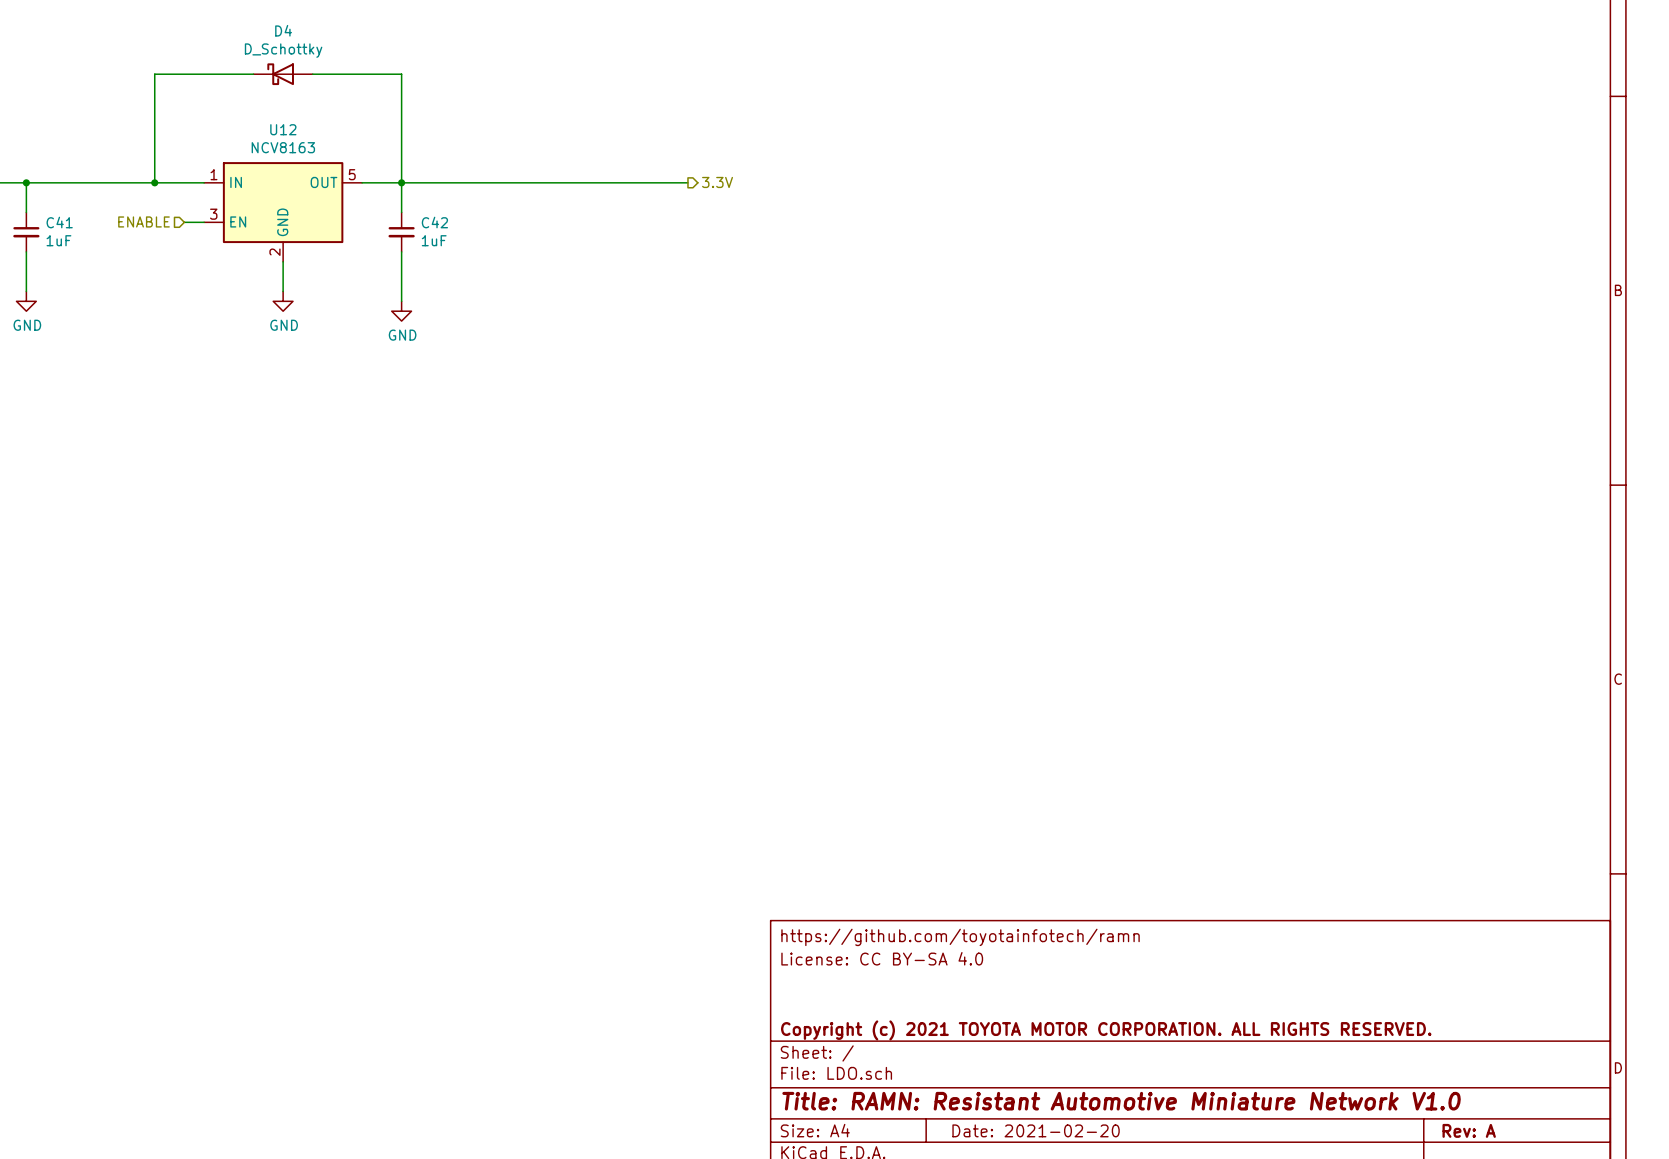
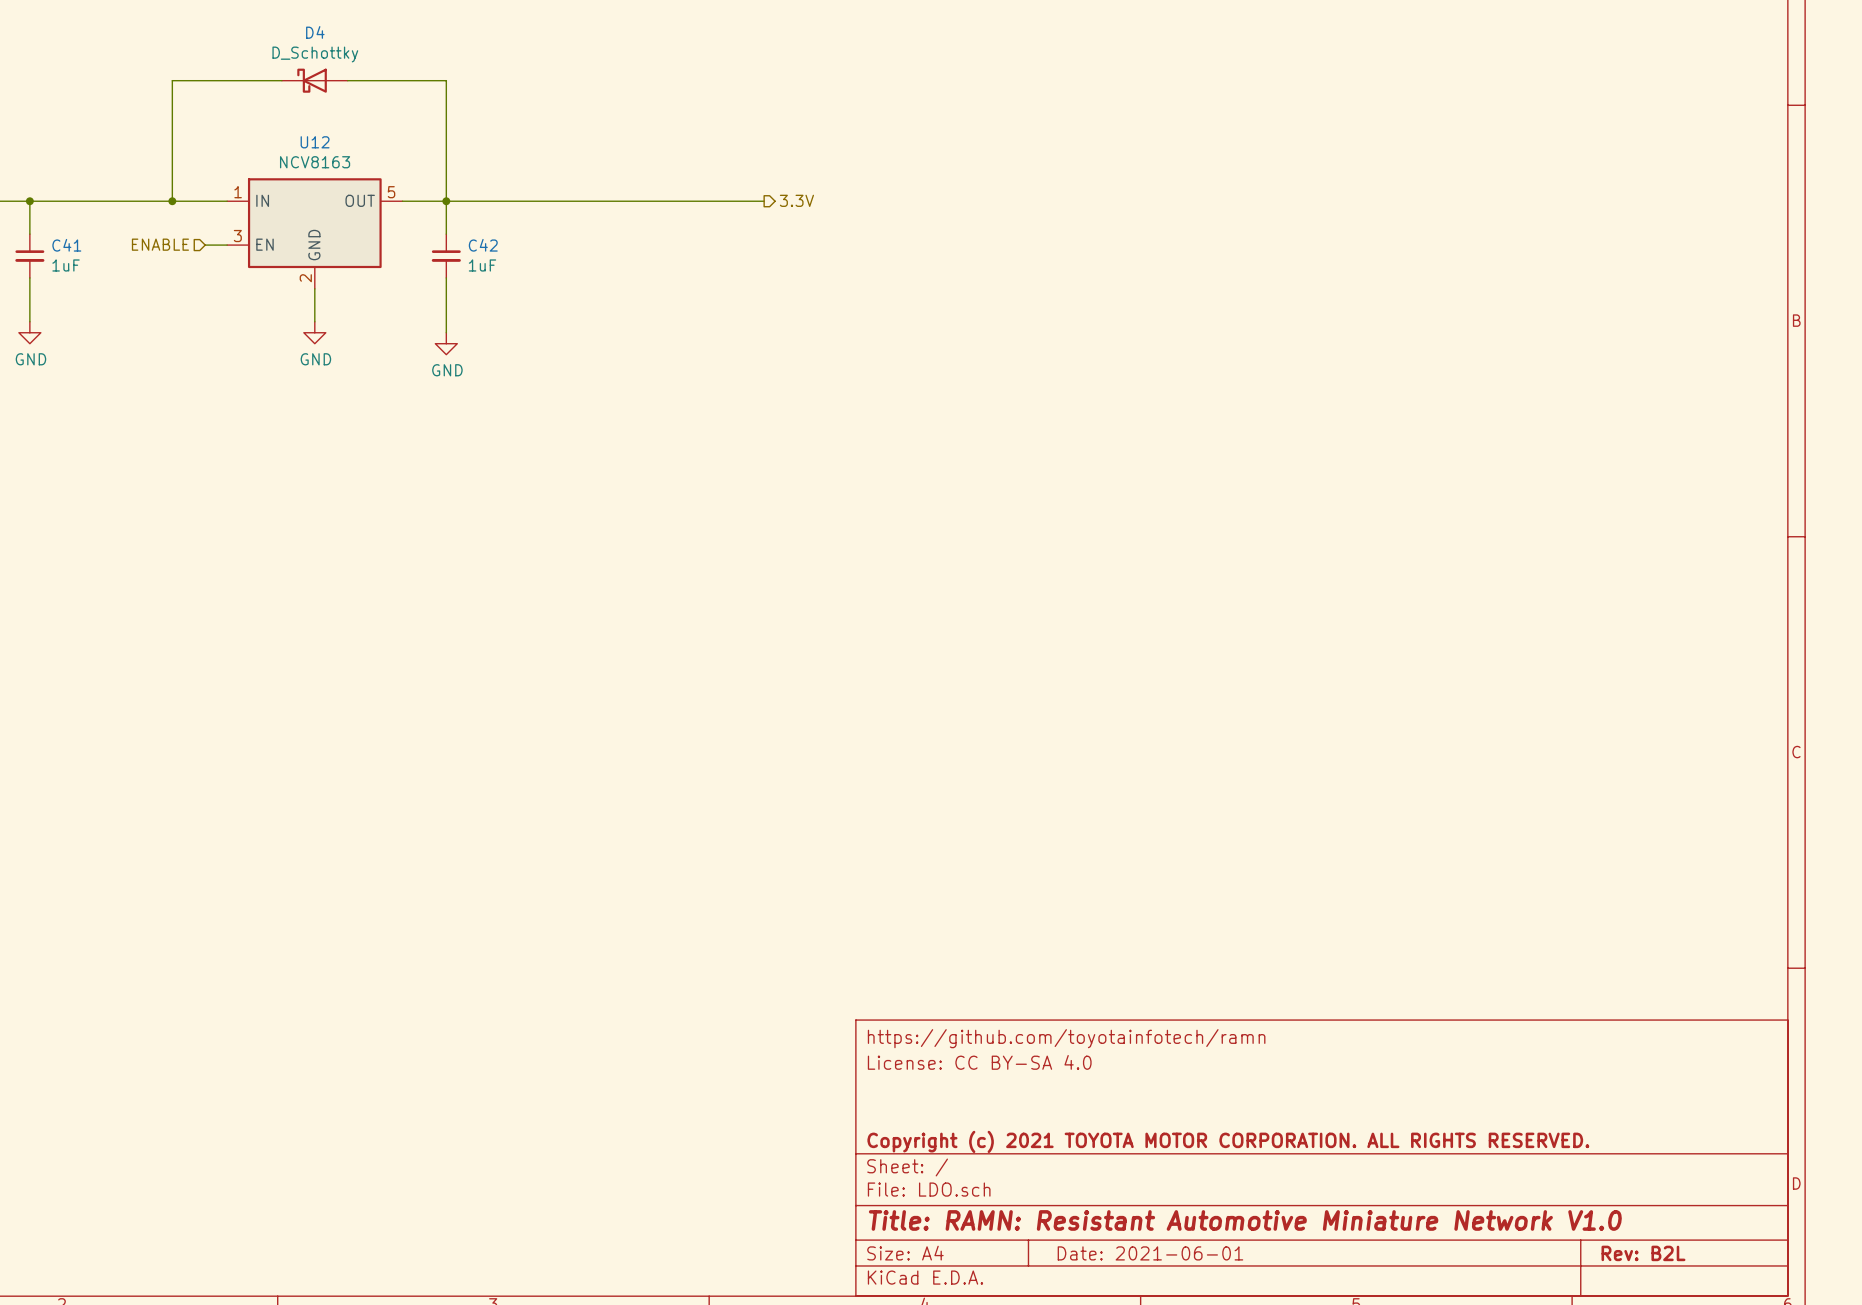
title block: Date: 2021-02-20 (1036, 1130) -> Date: 2021-06-01 (1150, 1253)
title block: Rev: A (1469, 1130) -> Rev: B2L (1643, 1253)

